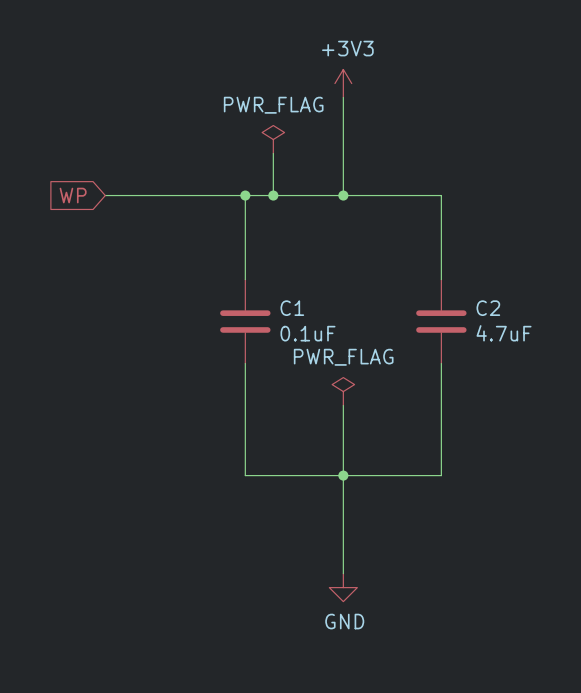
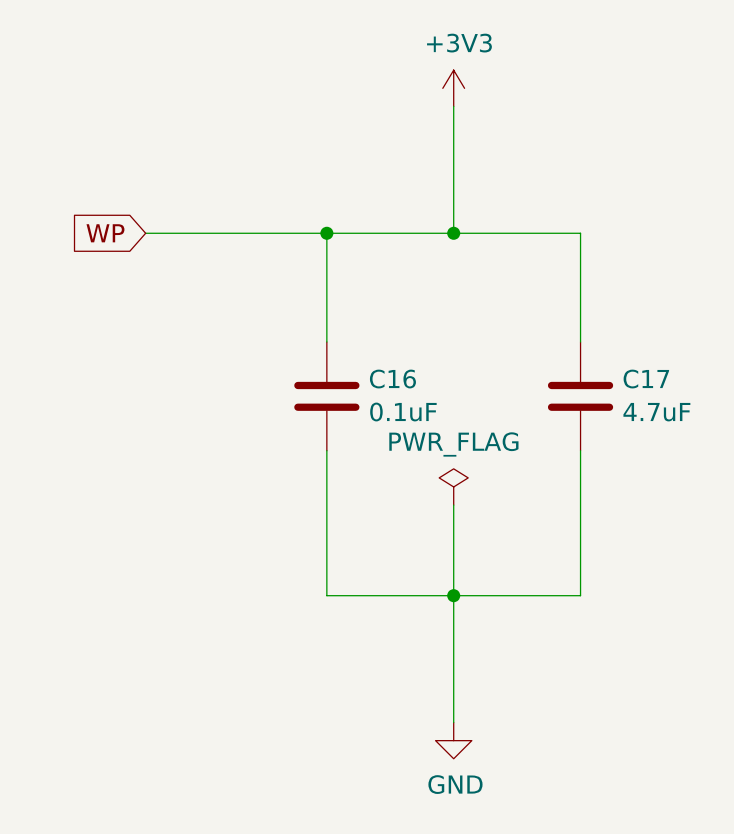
power symbol: PWR_FLAG (273, 139) -> none
wire: (273, 153) (273, 195) -> none
junction: (273, 195) -> none
C1 name: C1 (292, 308) -> C16 (392, 379)
C2 name: C2 (488, 308) -> C17 (646, 379)

